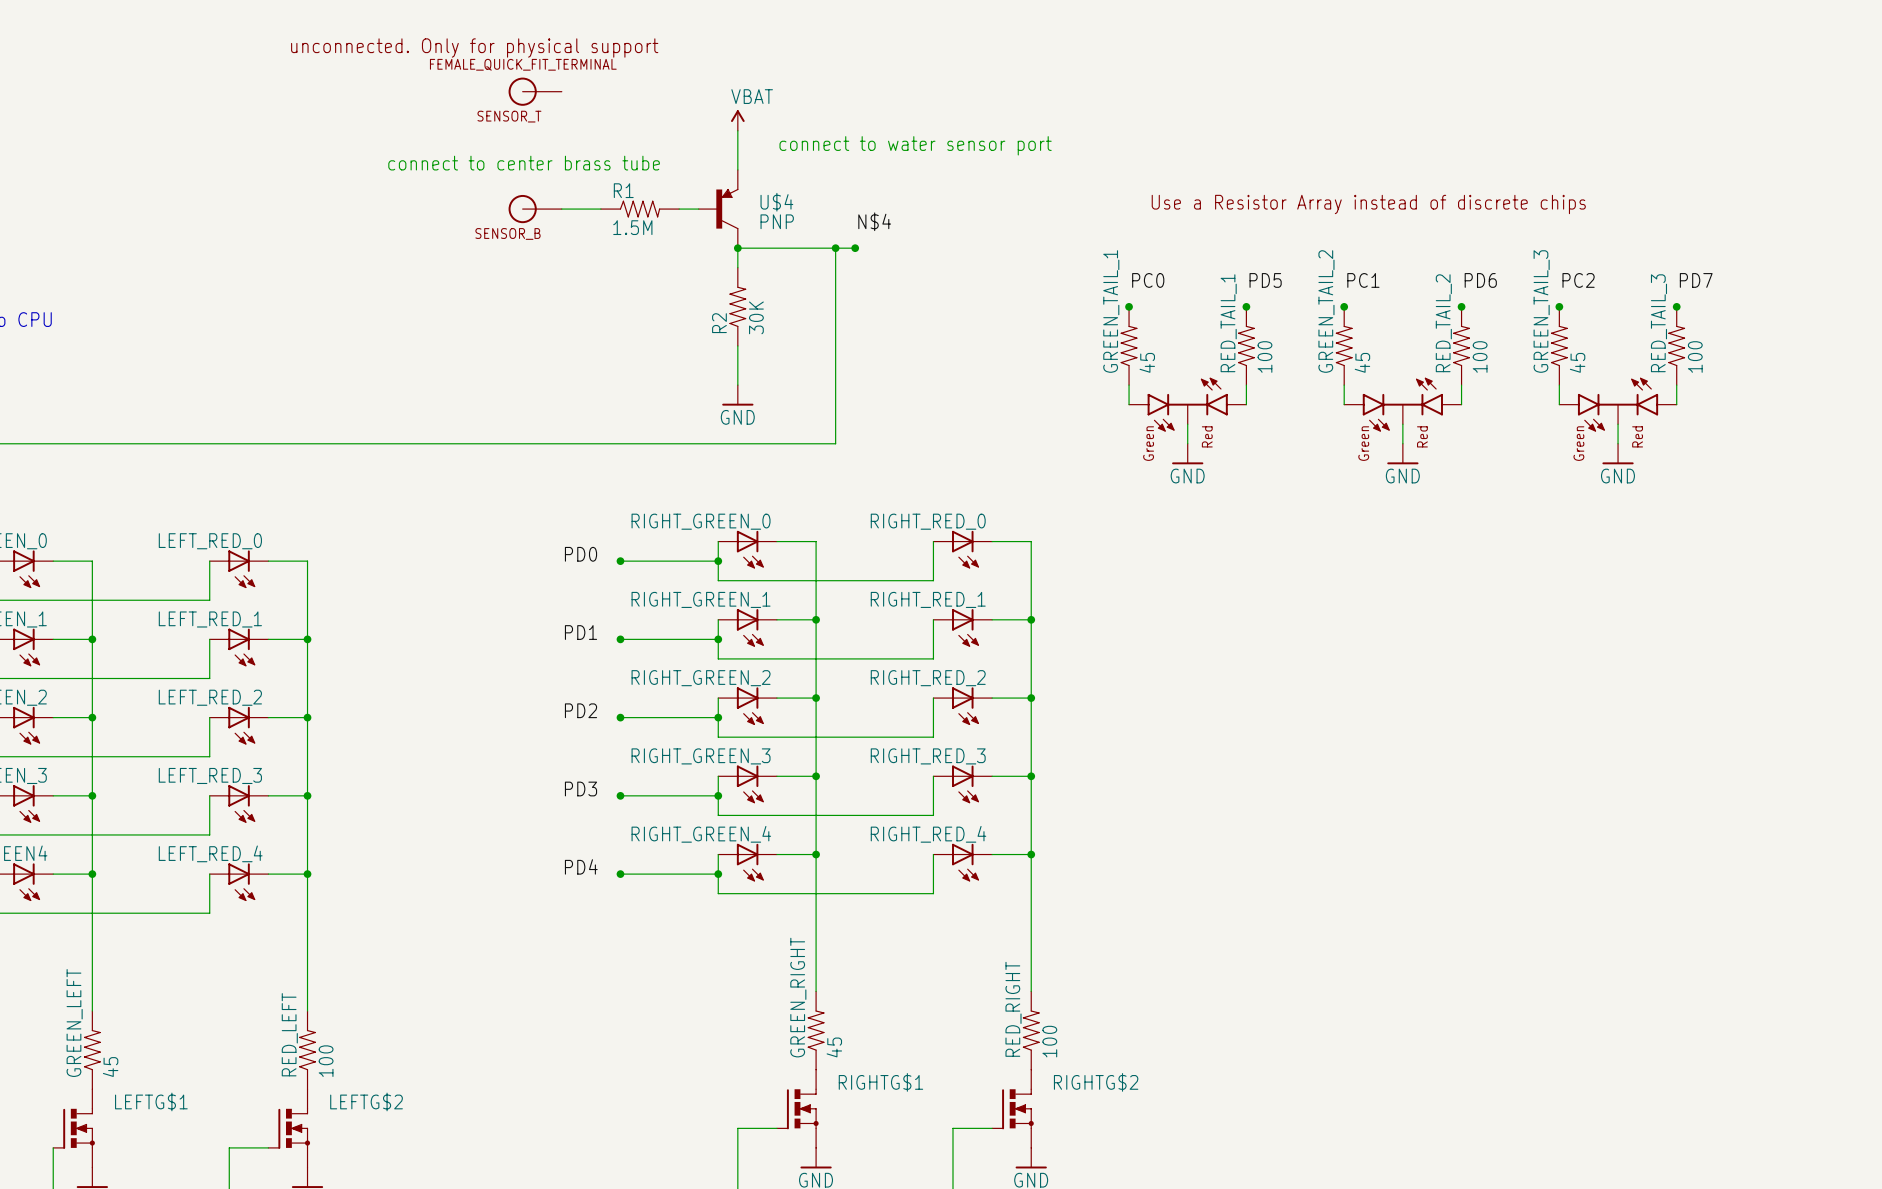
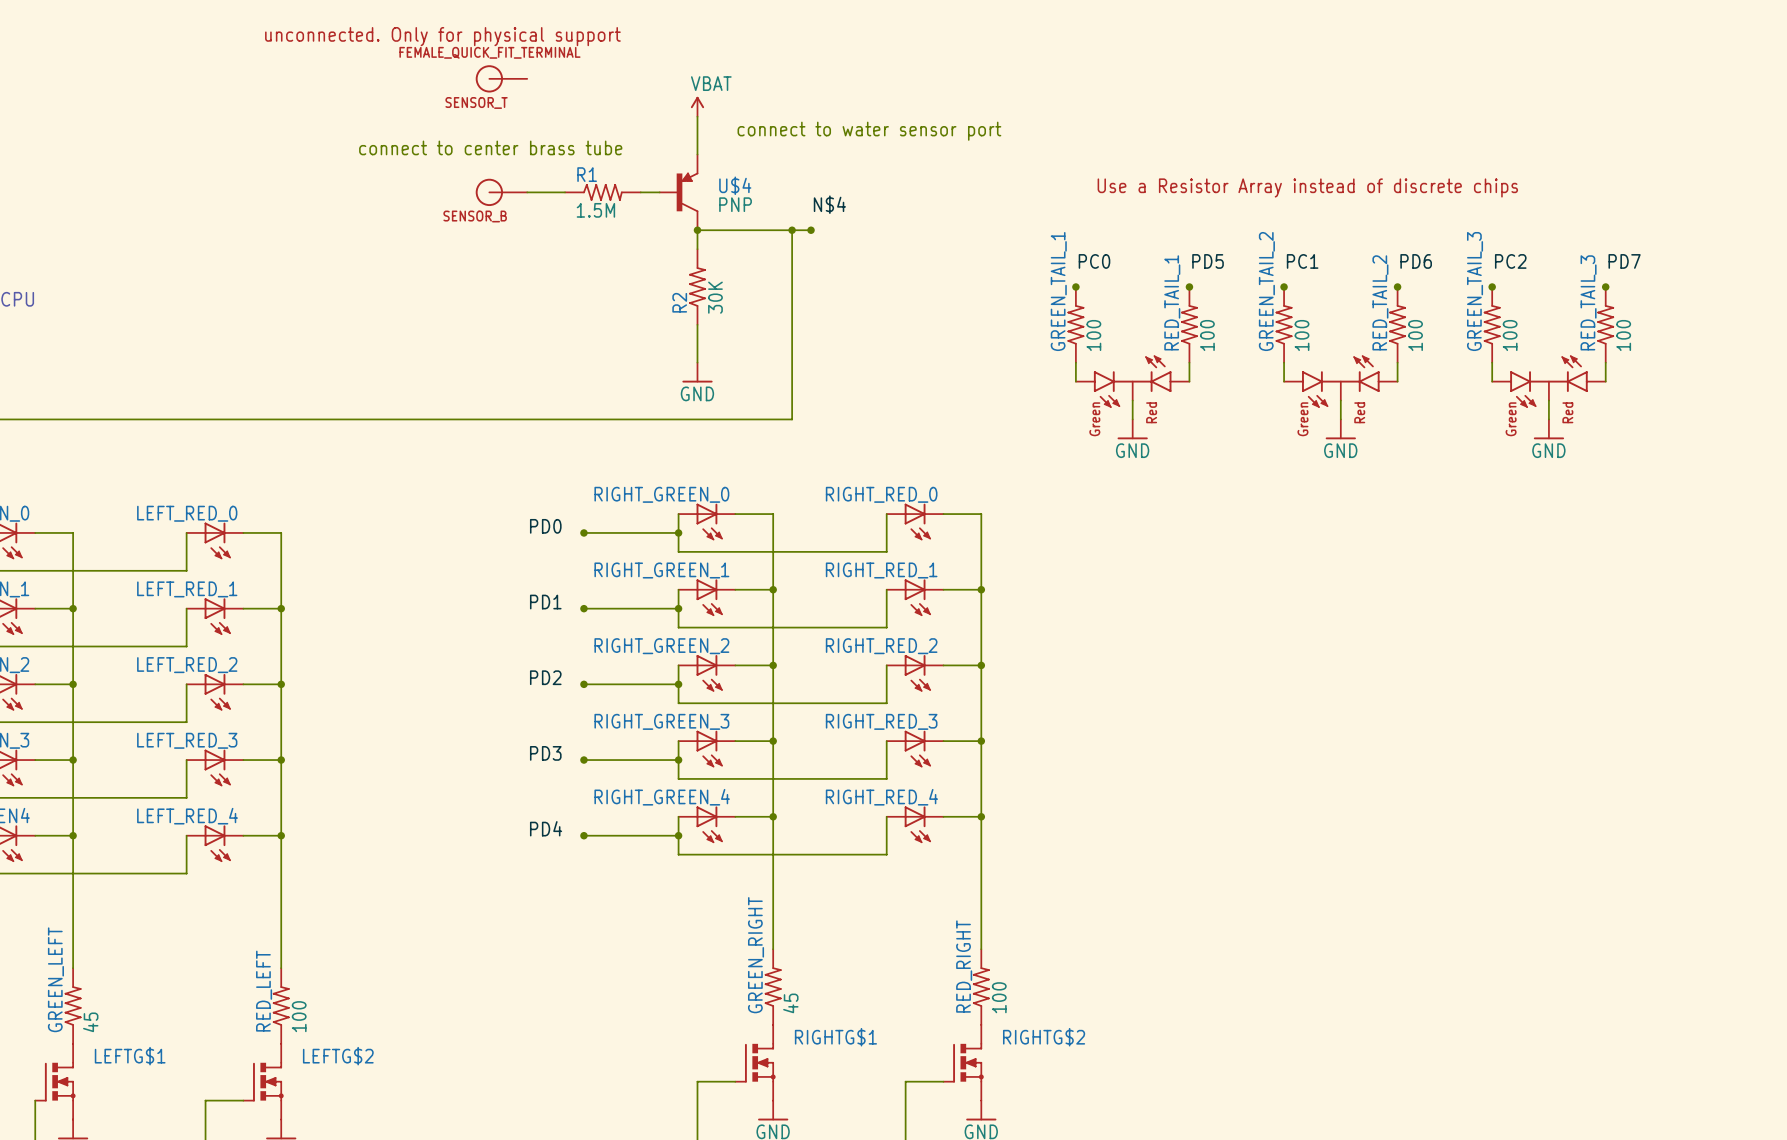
GREEN_TAIL_1 value: 45 (1147, 362) -> 100 (1093, 335)
GREEN_TAIL_2 value: 45 (1362, 362) -> 100 (1302, 335)
GREEN_TAIL_3 value: 45 (1577, 362) -> 100 (1510, 335)

